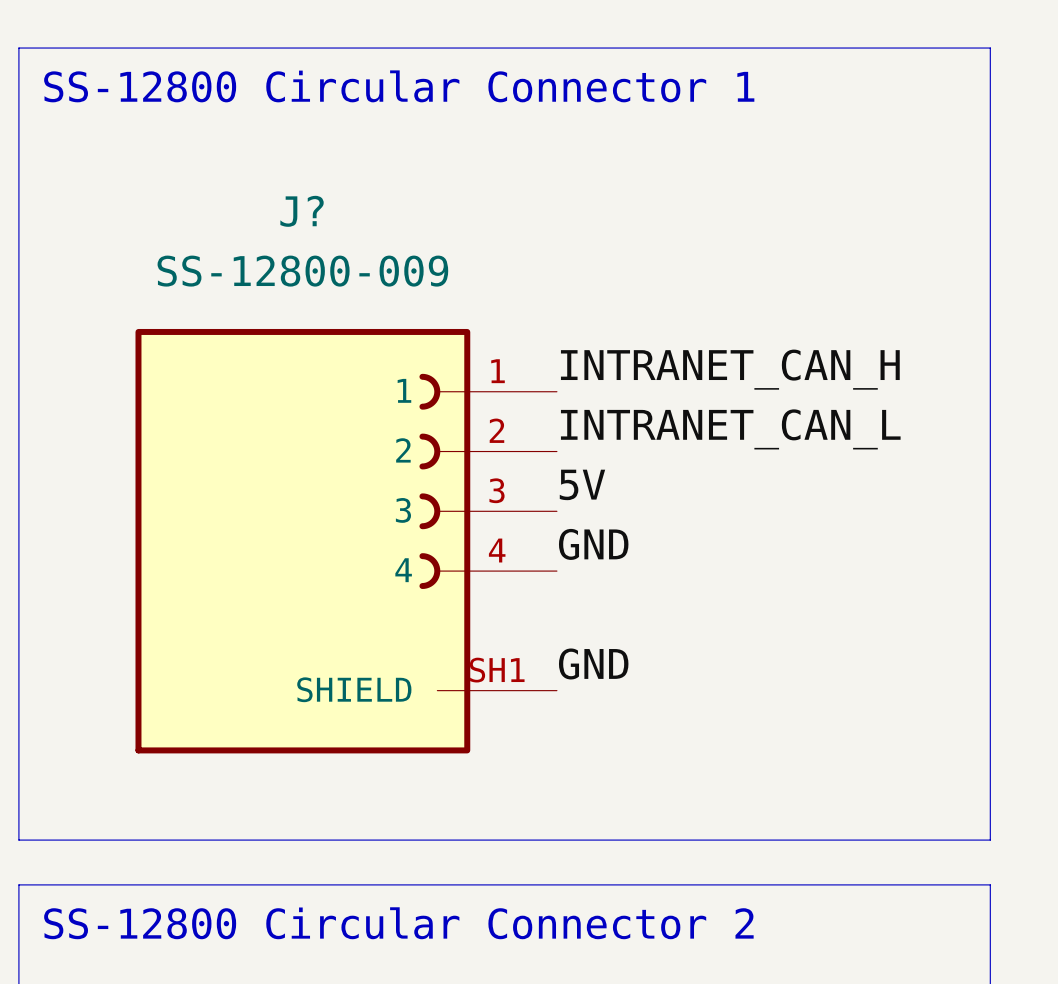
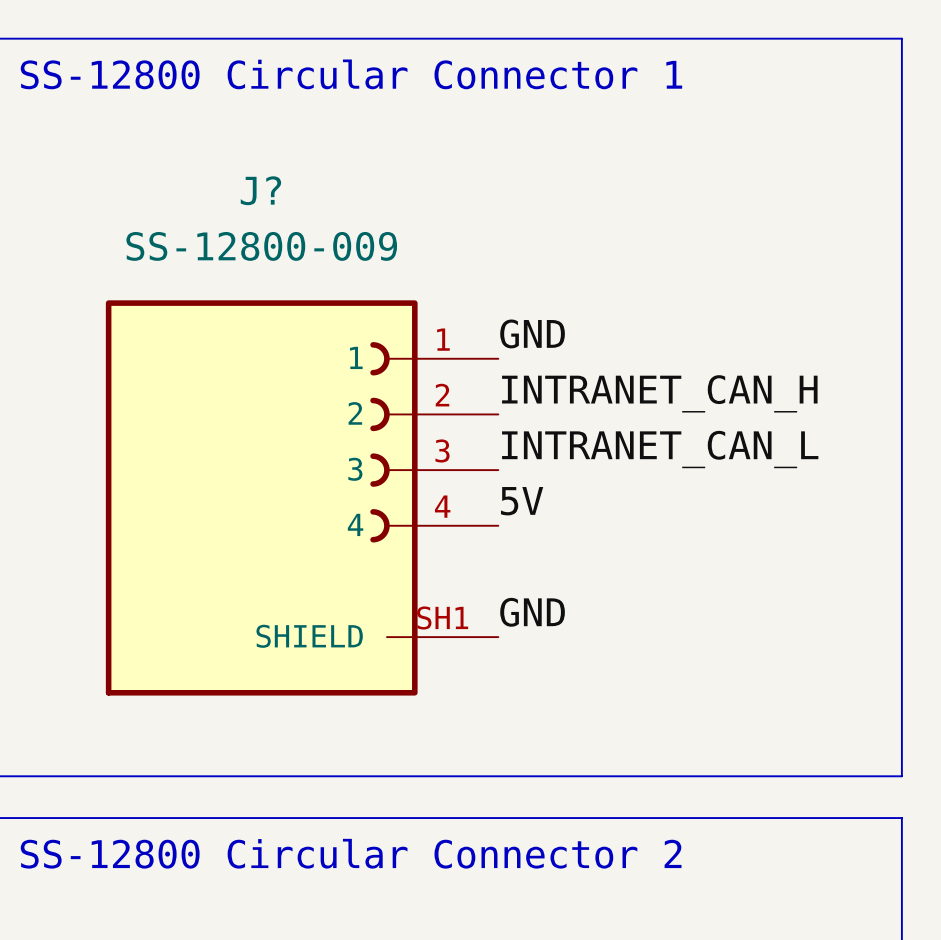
label: INTRANET_CAN_H (730, 369) -> GND (532, 333)
label: INTRANET_CAN_L (730, 429) -> INTRANET_CAN_H (659, 393)
label: 5V (582, 484) -> INTRANET_CAN_L (660, 449)
label: GND (593, 544) -> 5V (522, 501)

